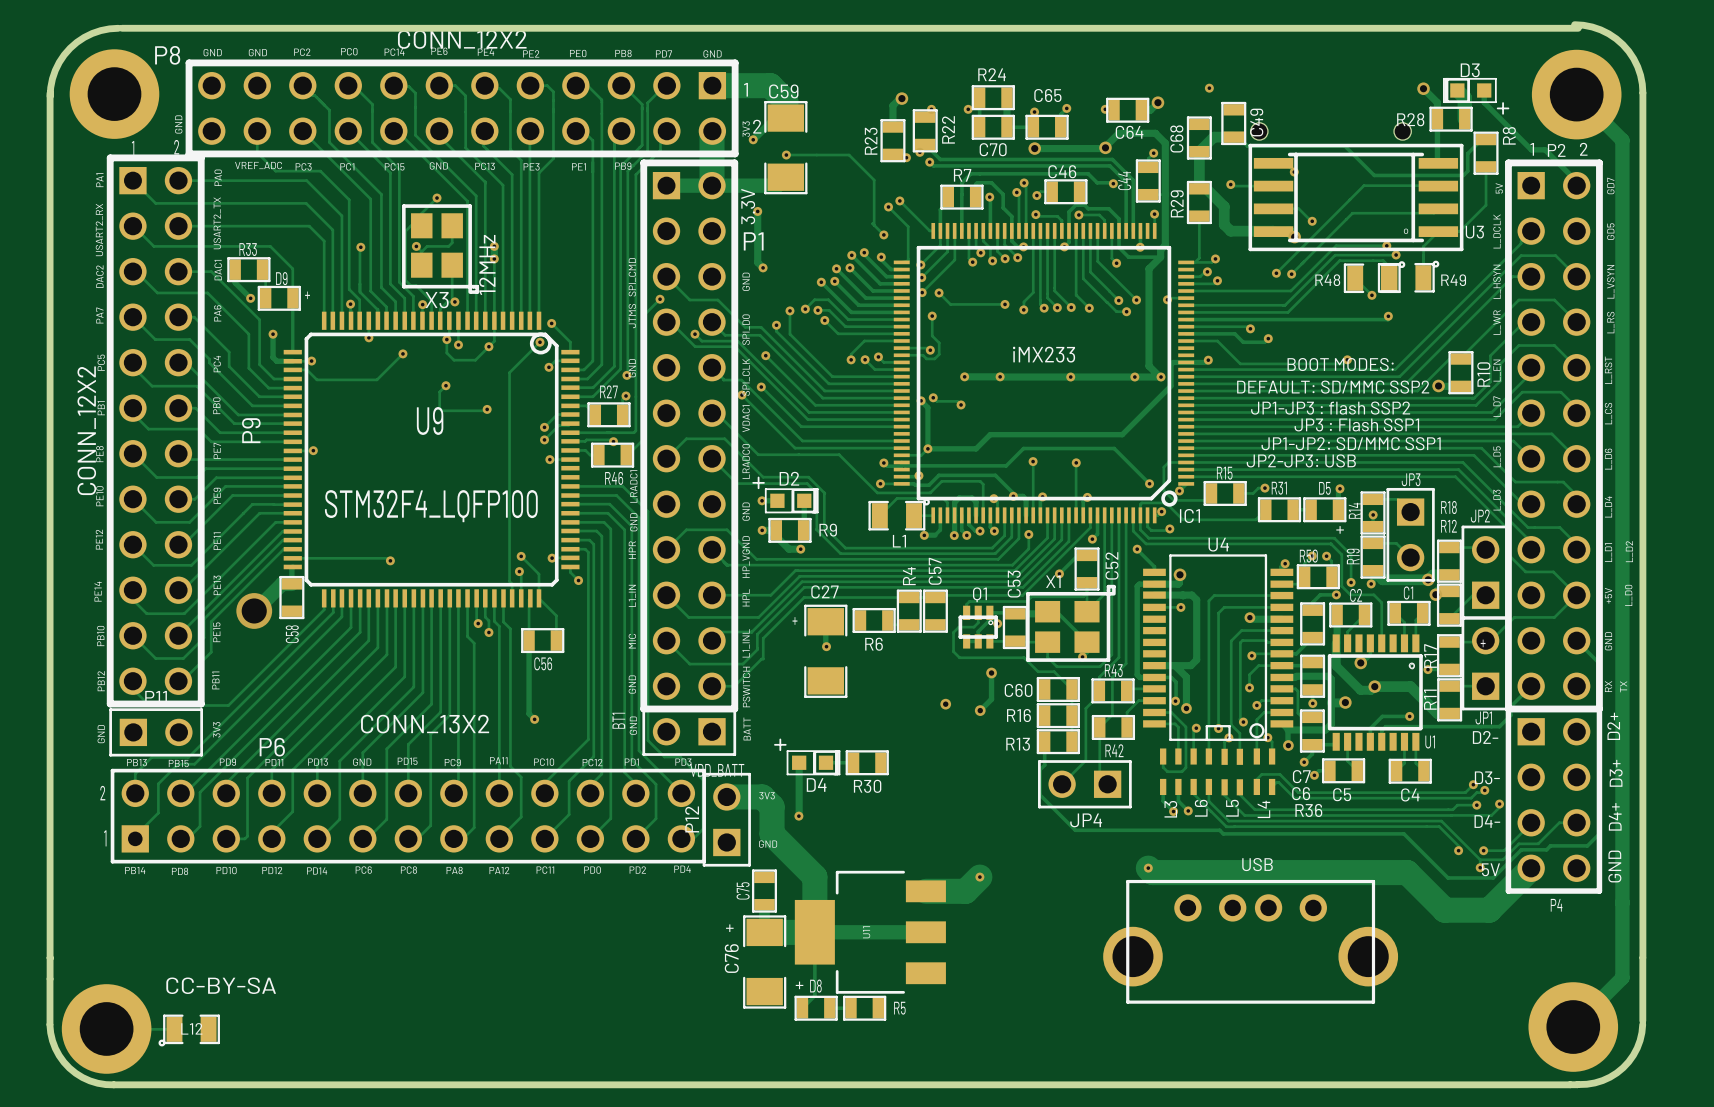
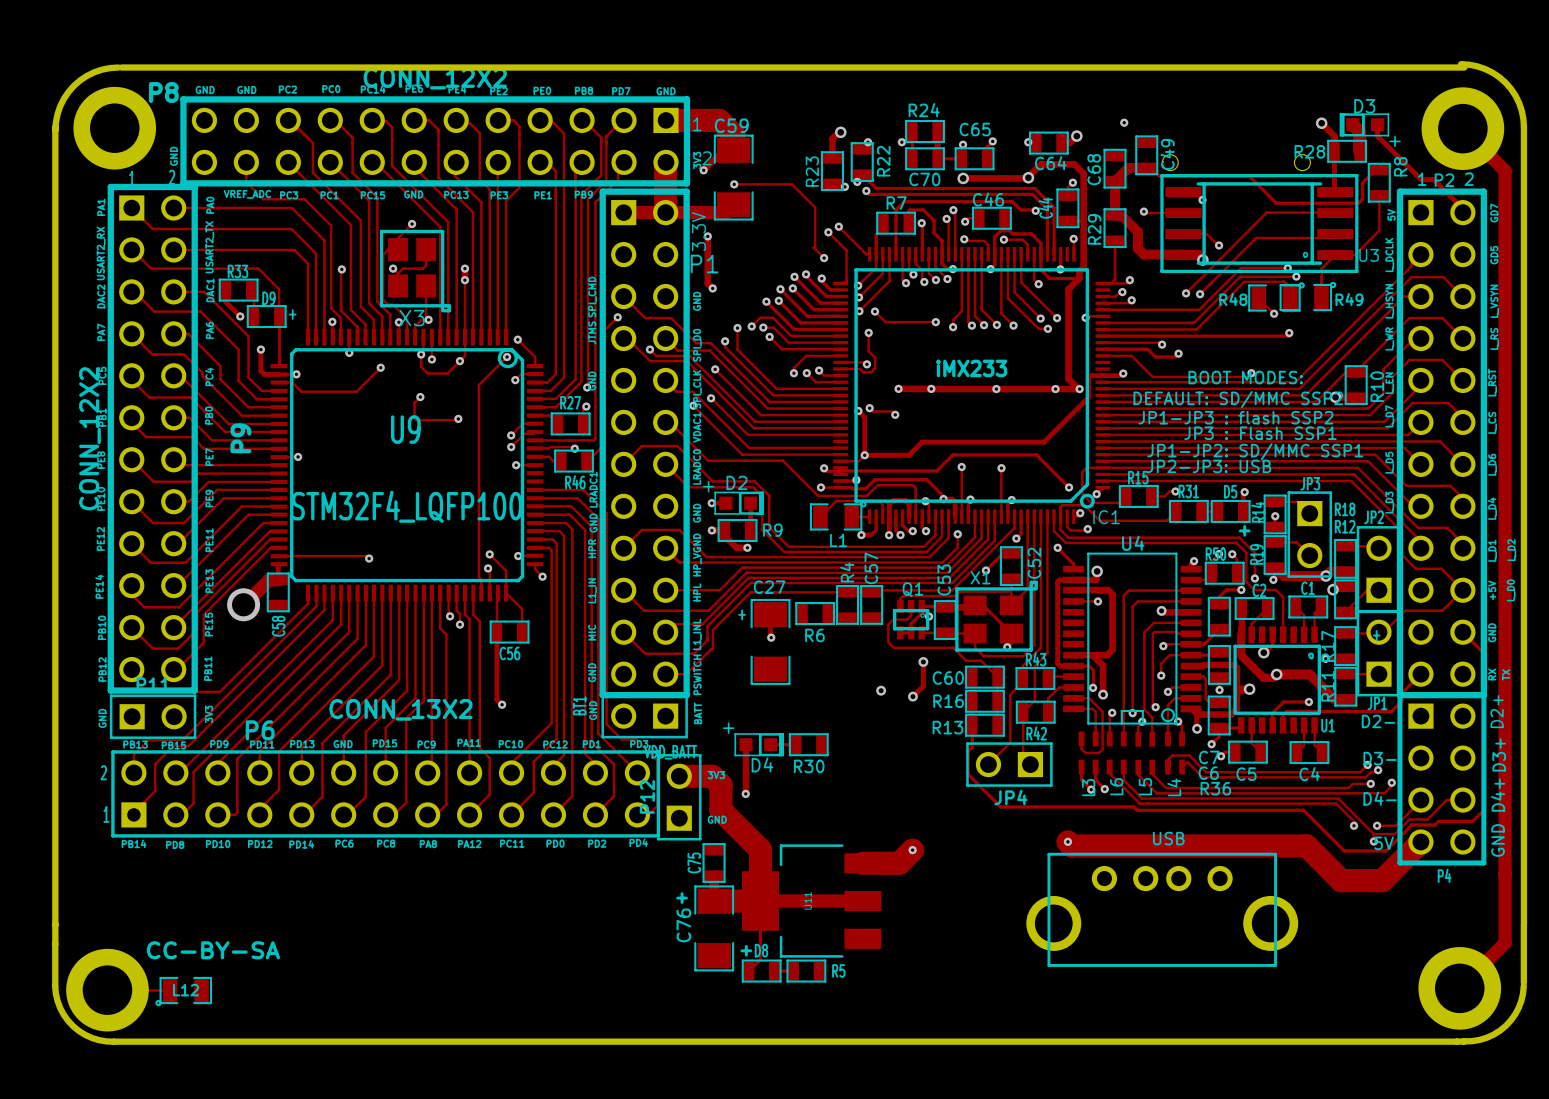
X3 value: 12MHz (487, 264) -> none

